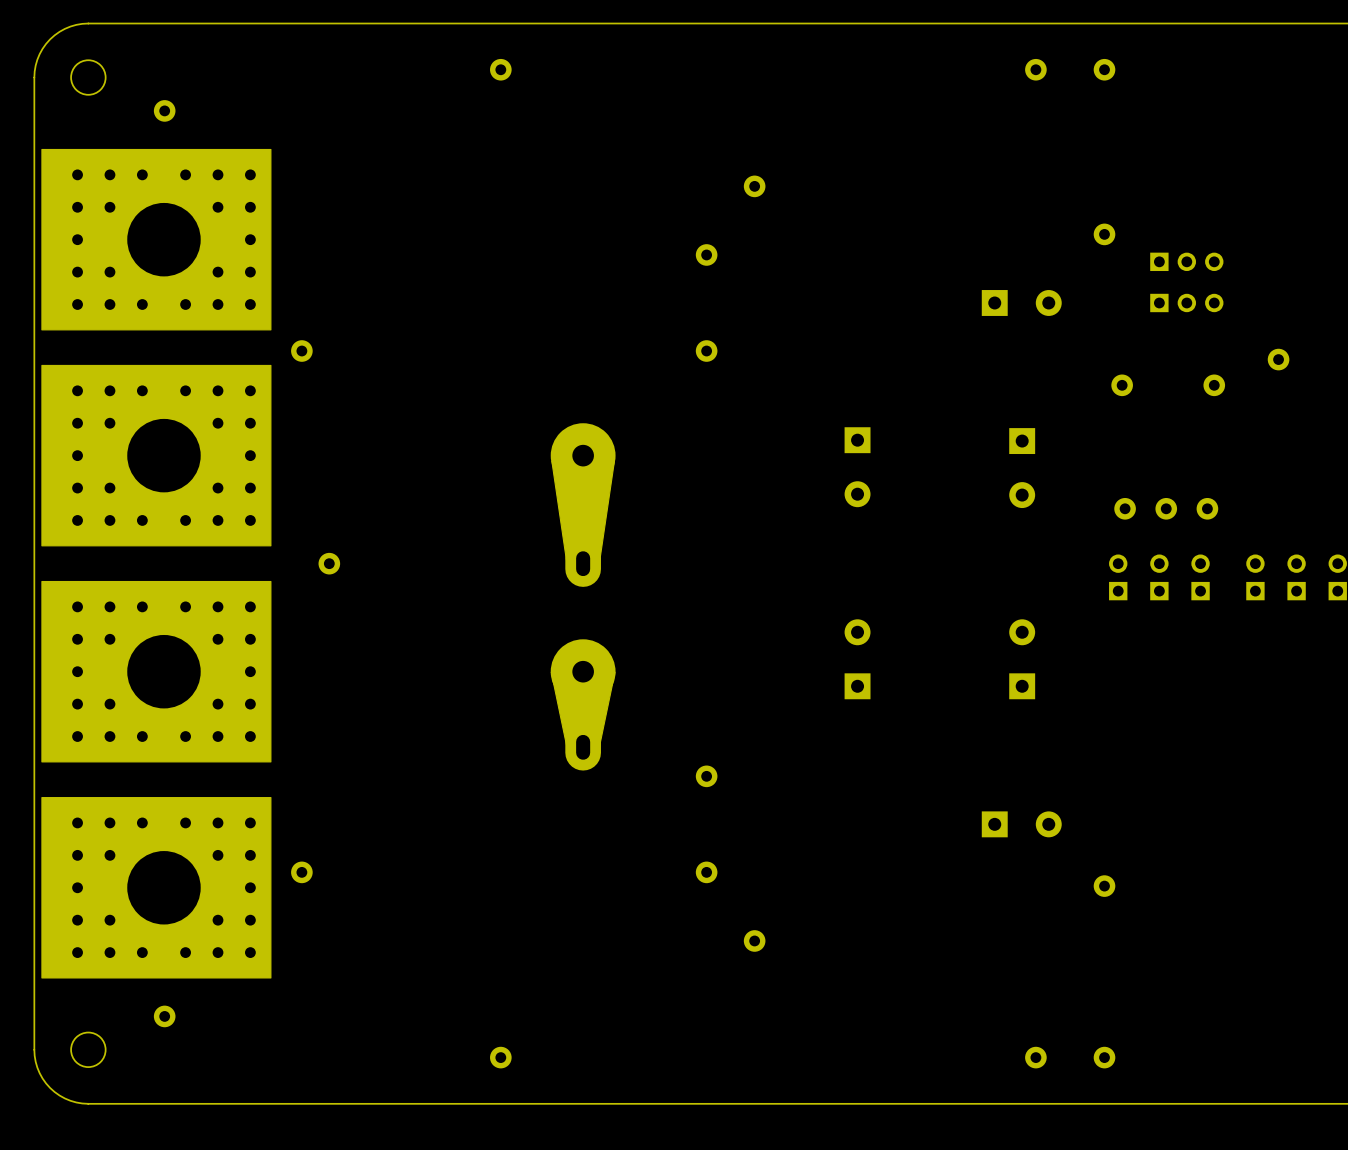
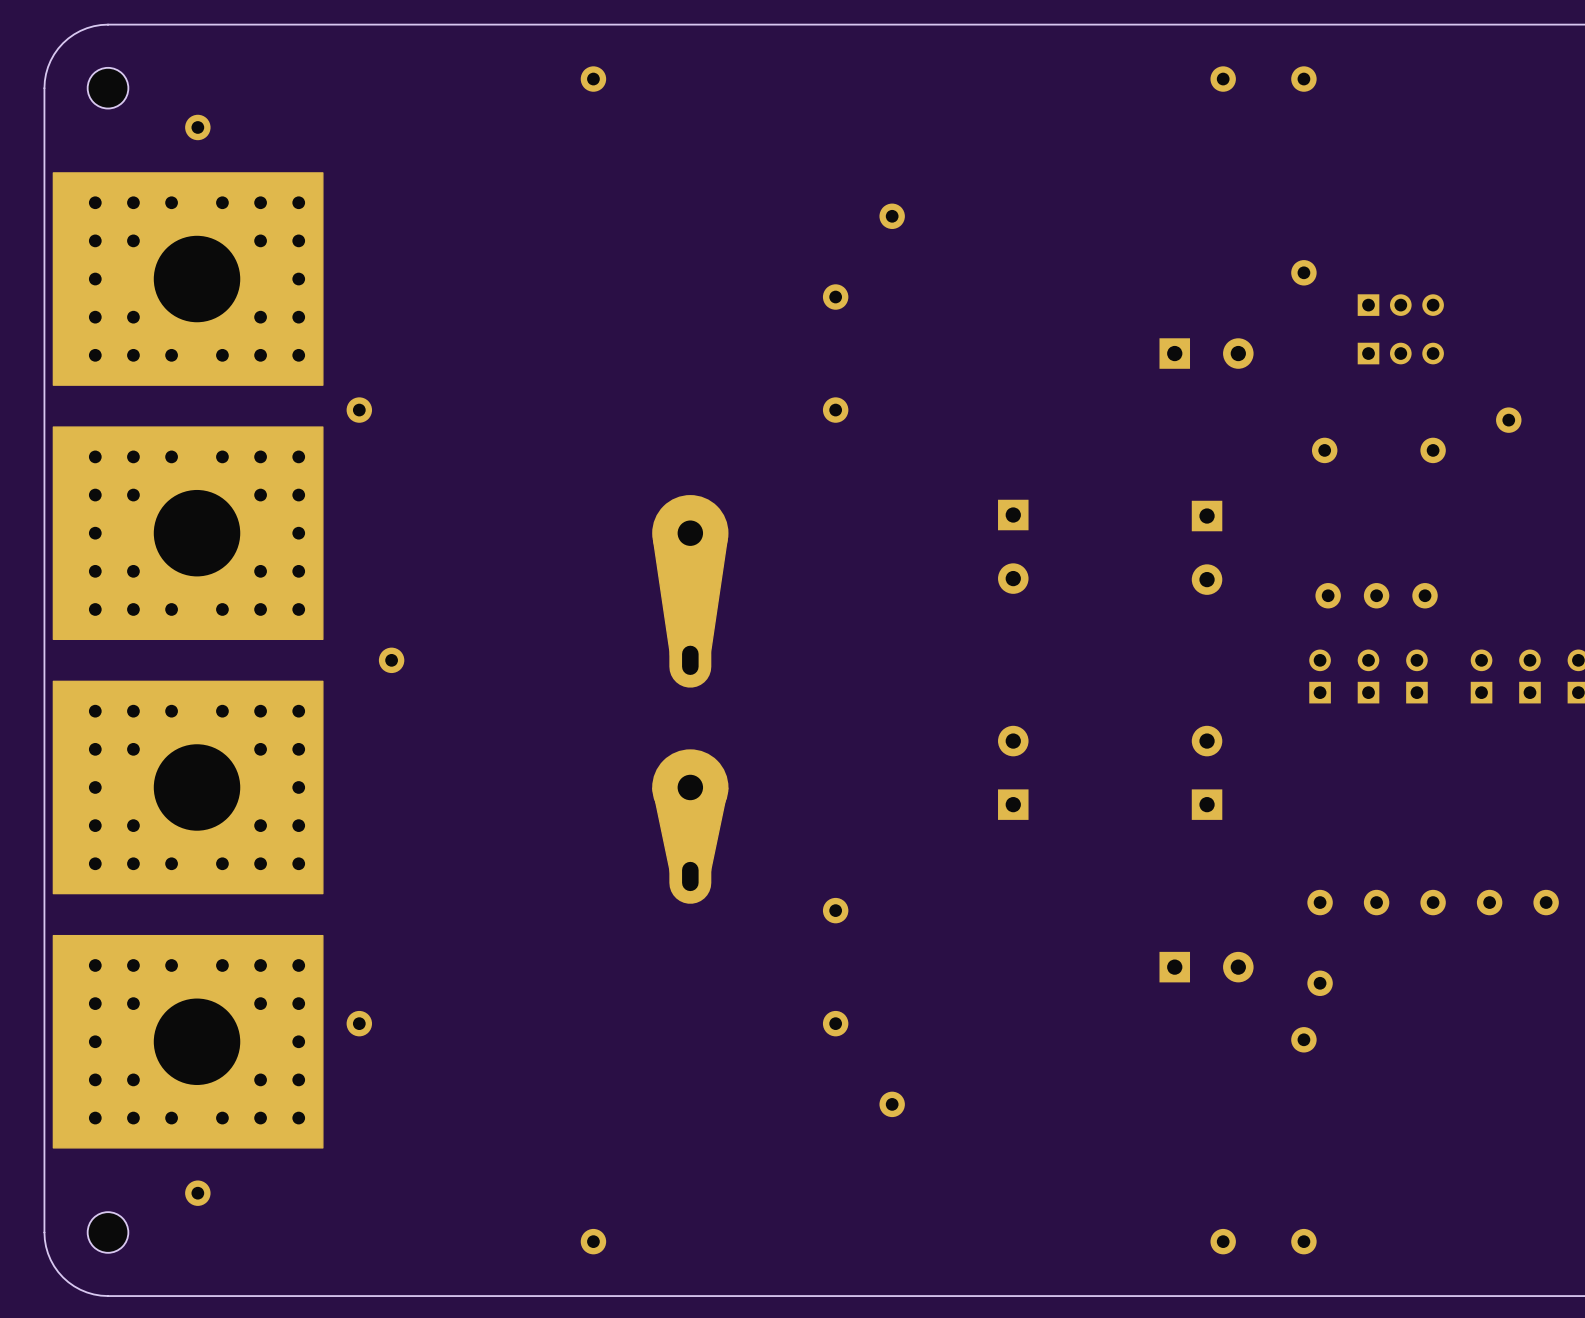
part: none -> (1320, 902)
part: none -> (1376, 902)
part: none -> (1433, 902)
part: none -> (1489, 902)
part: none -> (1546, 902)
part: none -> (1320, 983)

